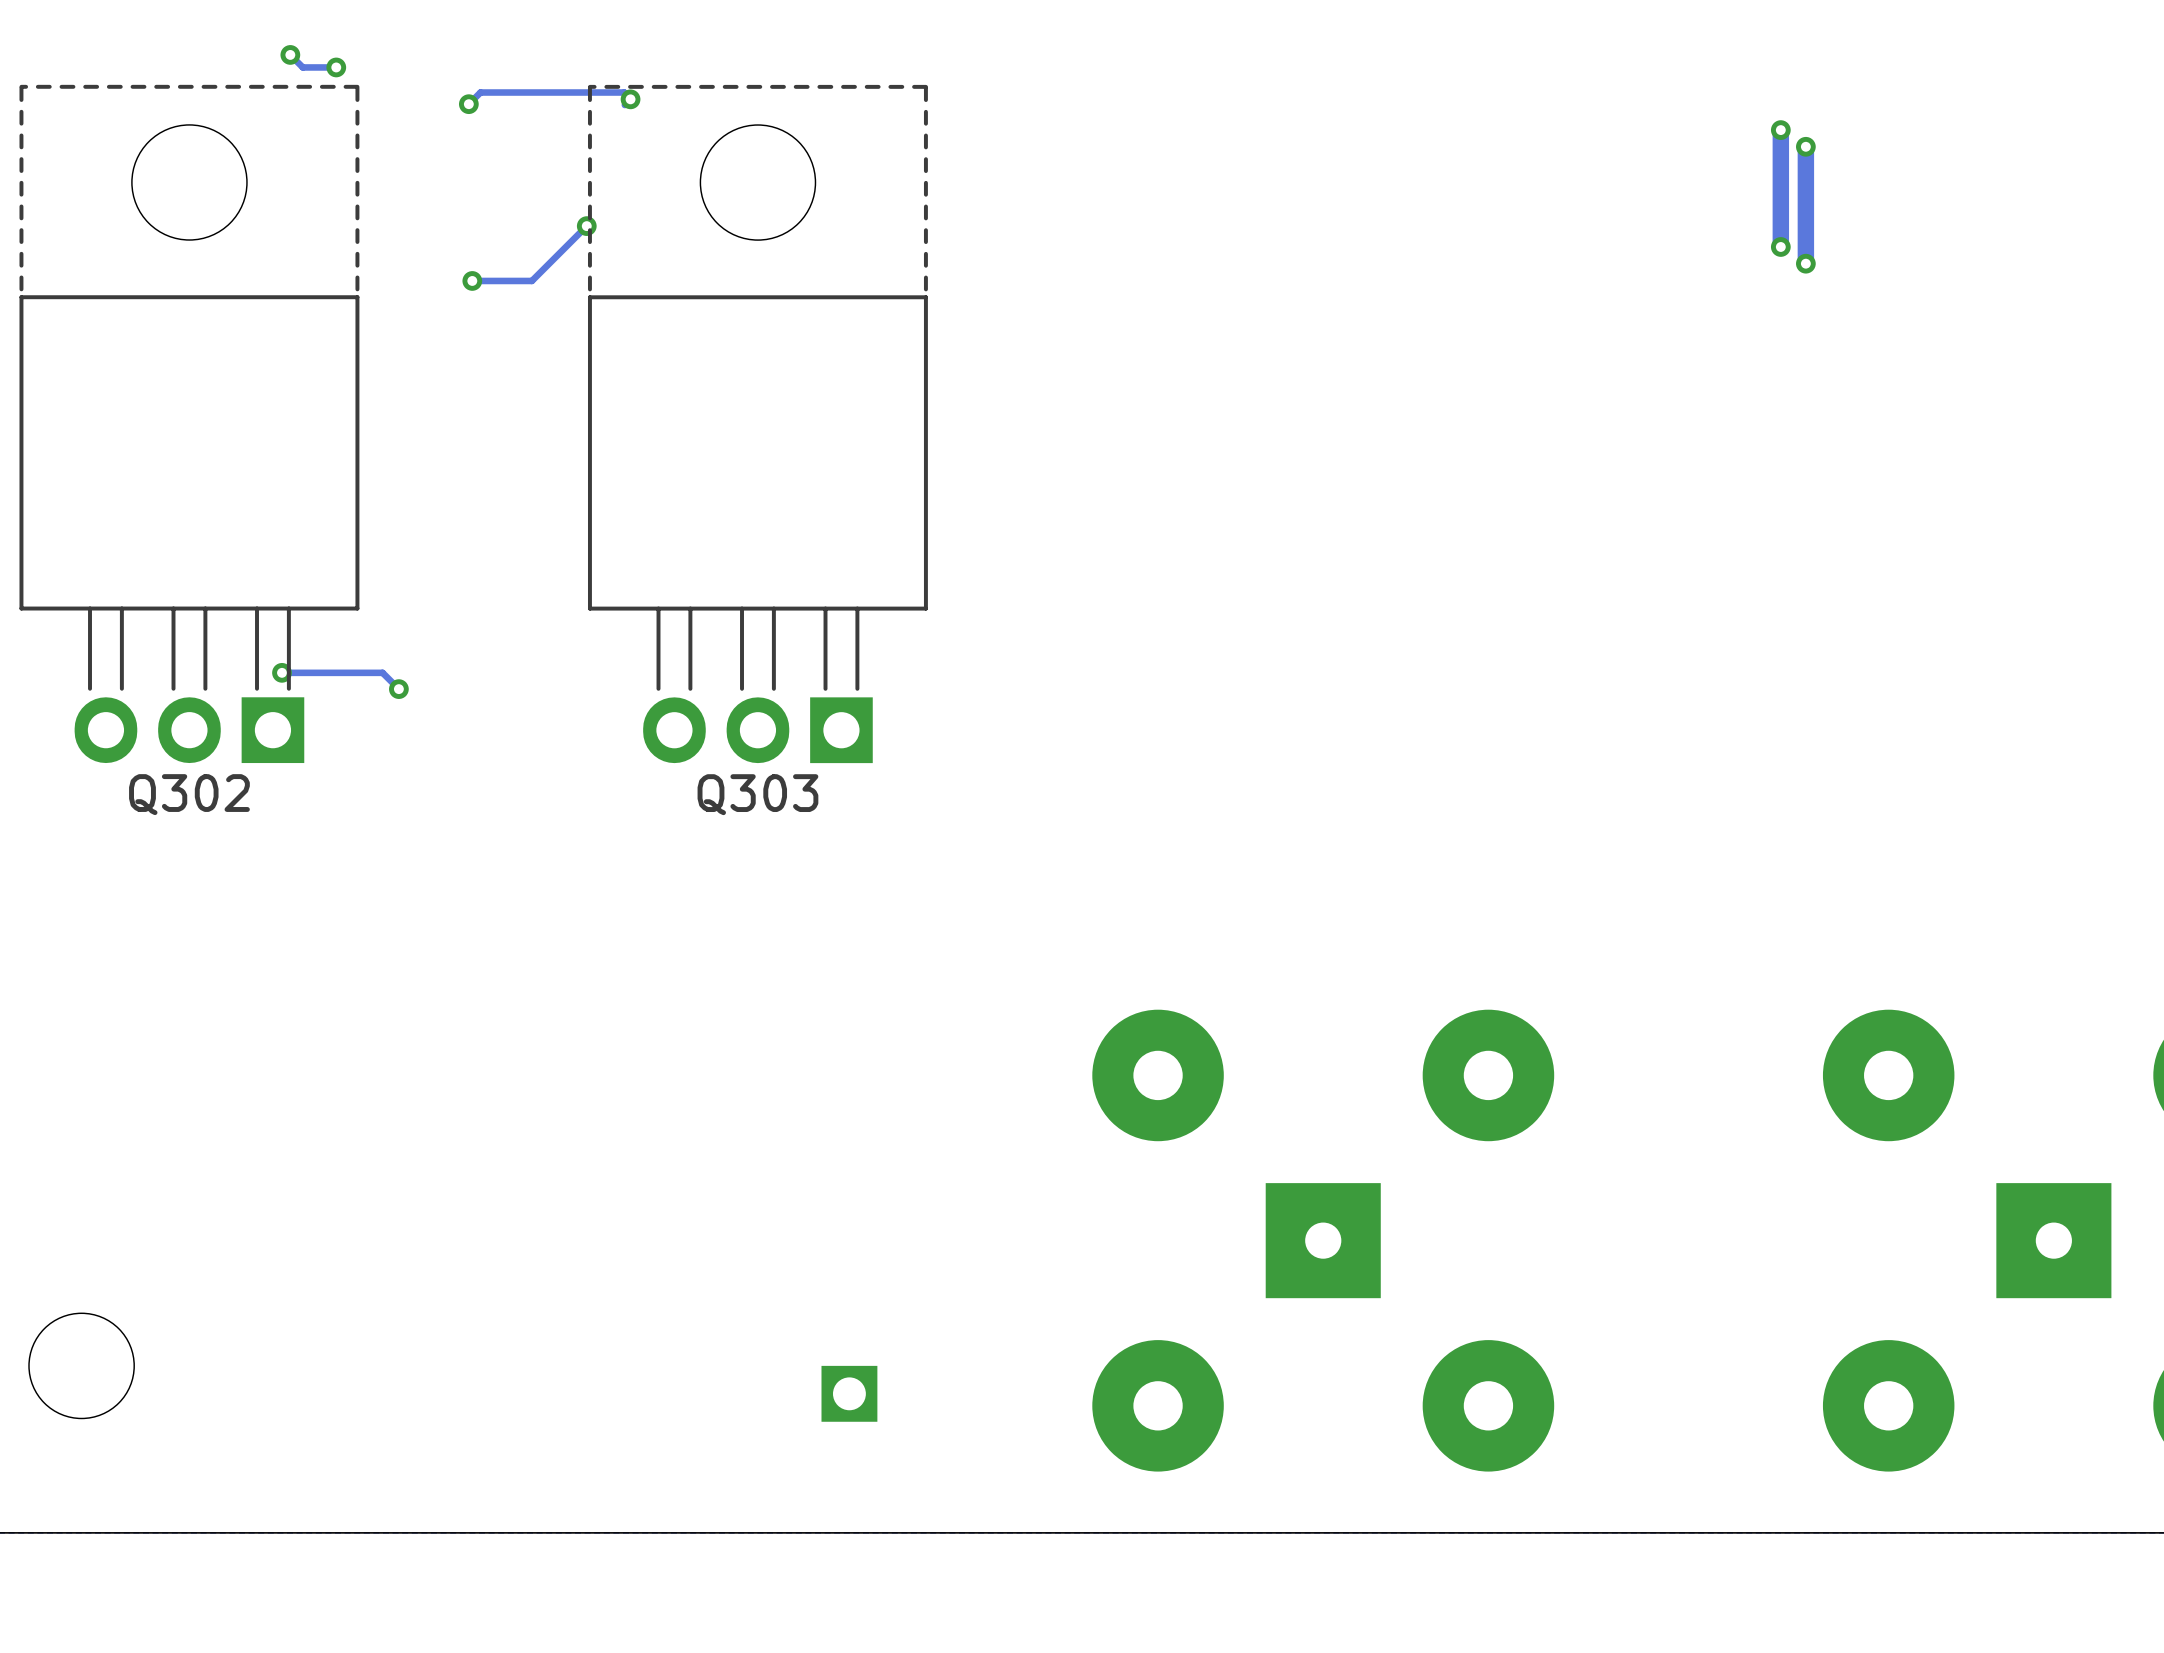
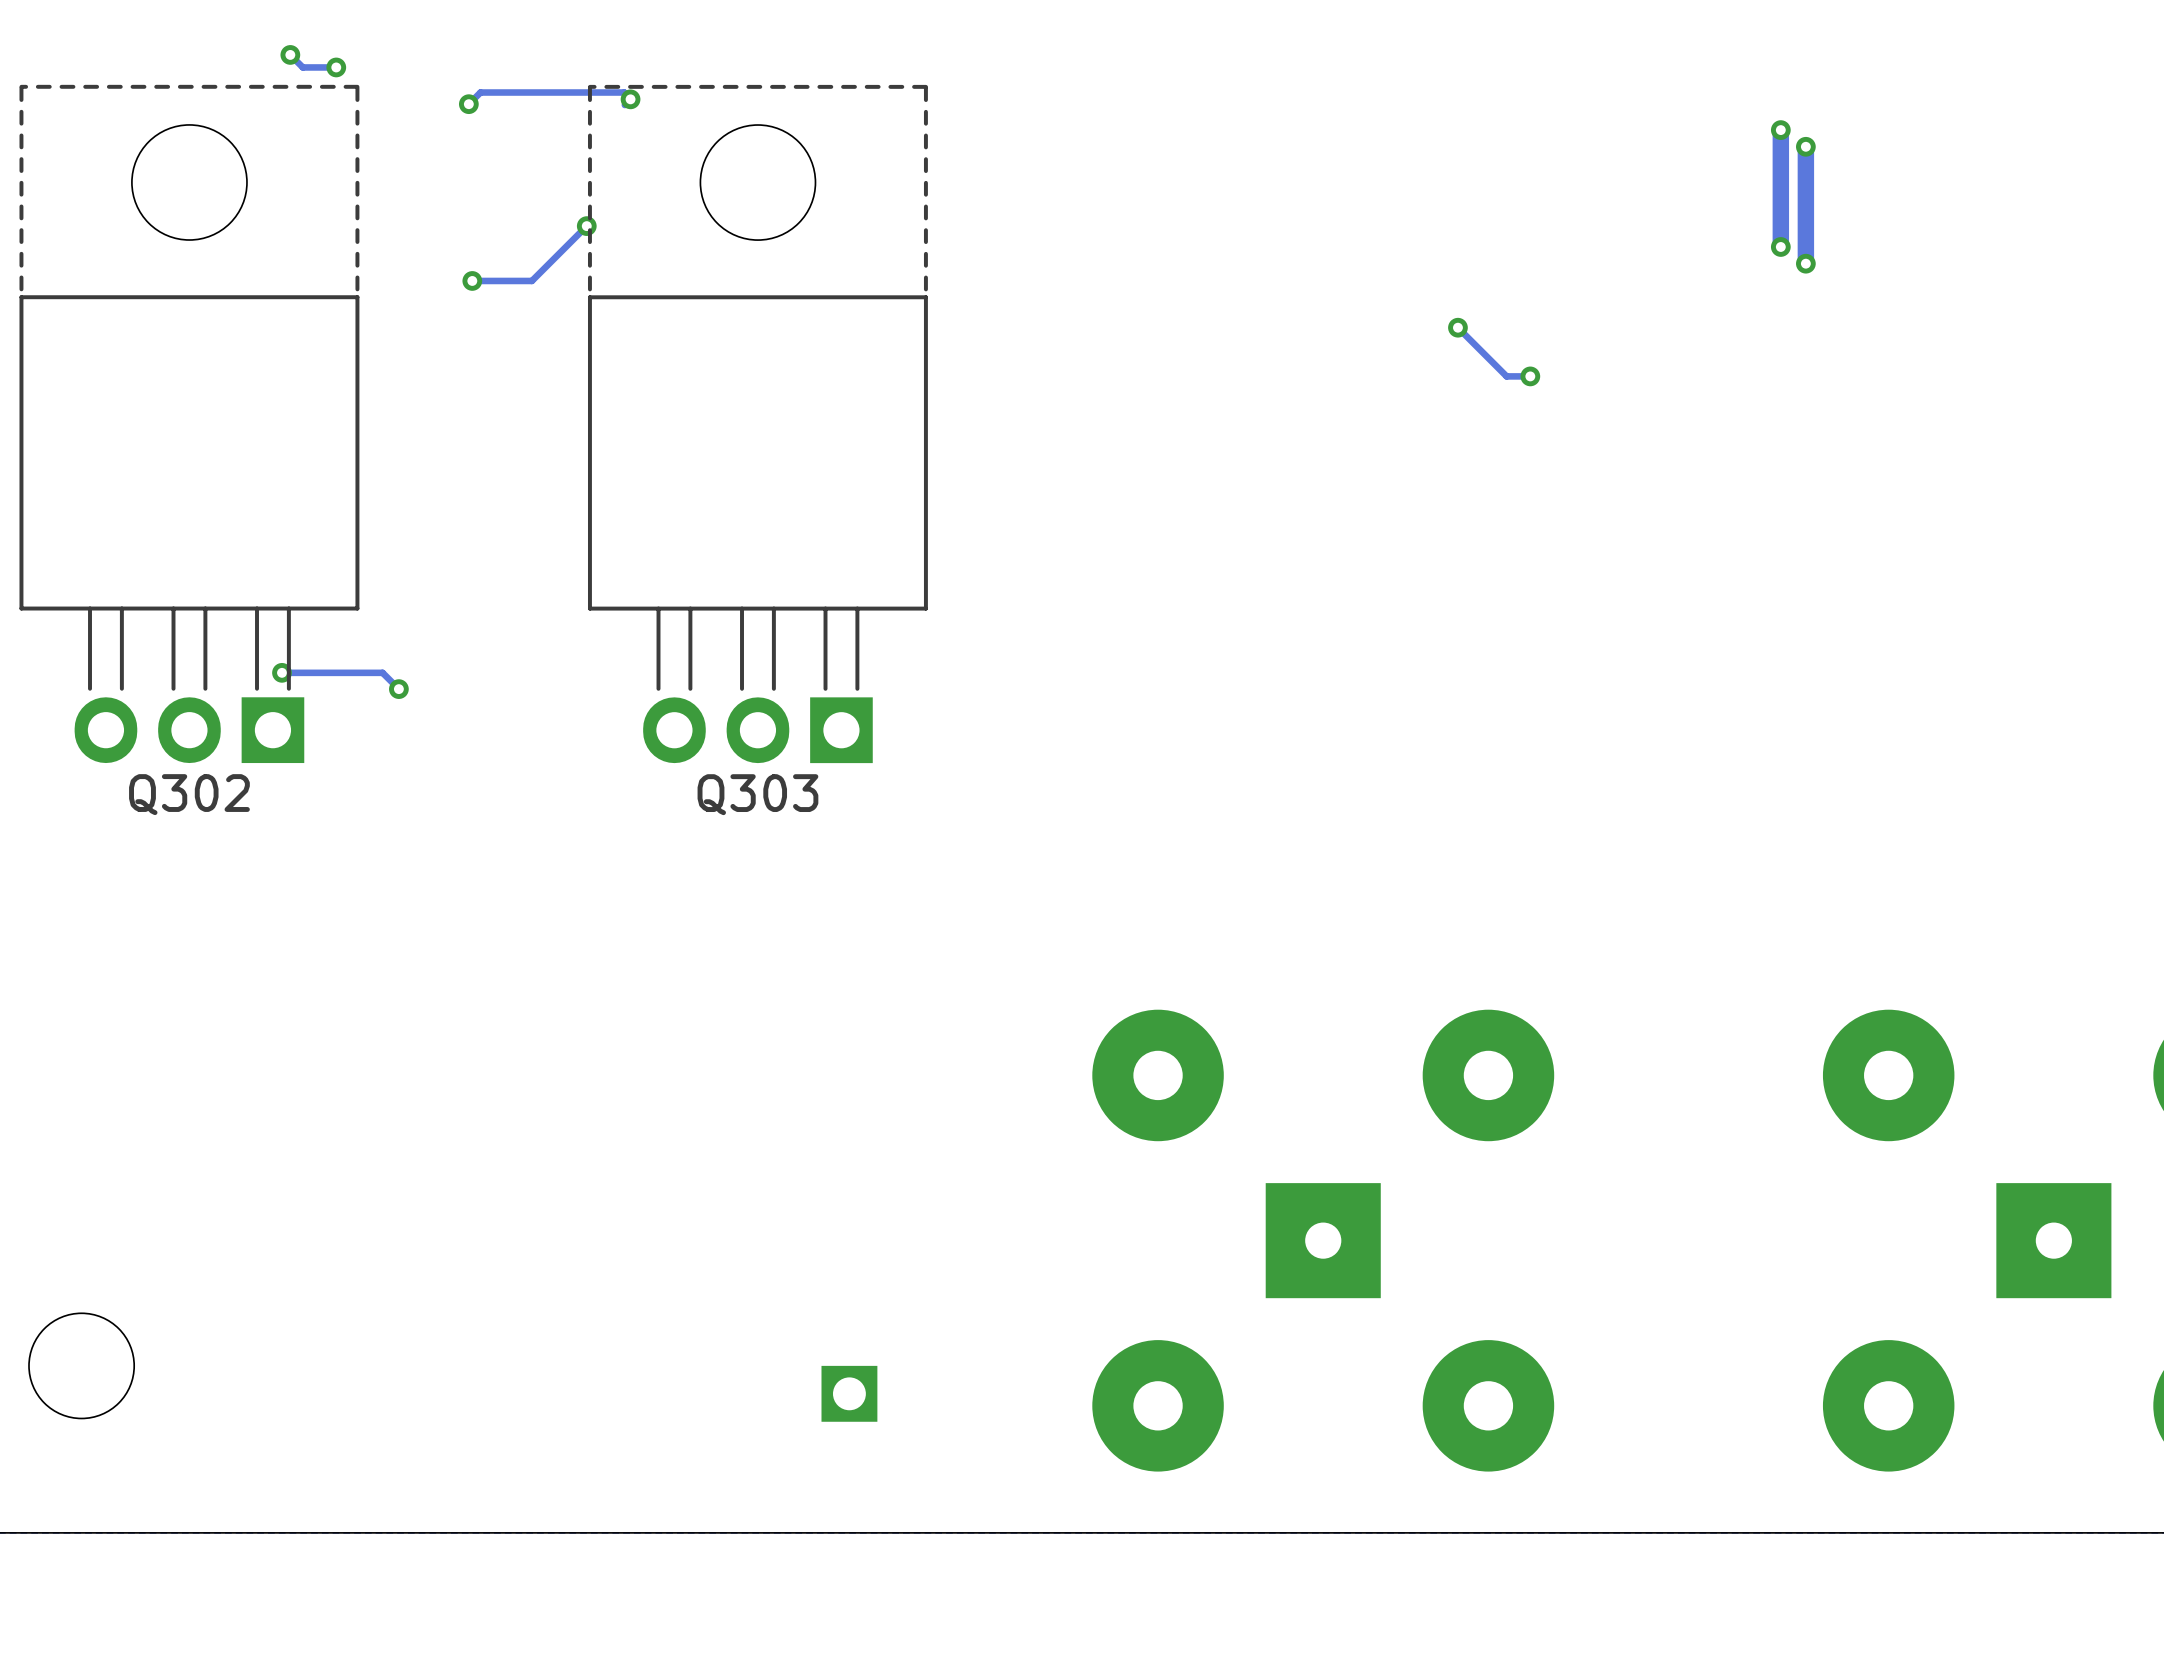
track: none -> (1457, 327) (1506, 376) (1530, 376)
via: none -> (1457, 327)
via: none -> (1530, 376)

